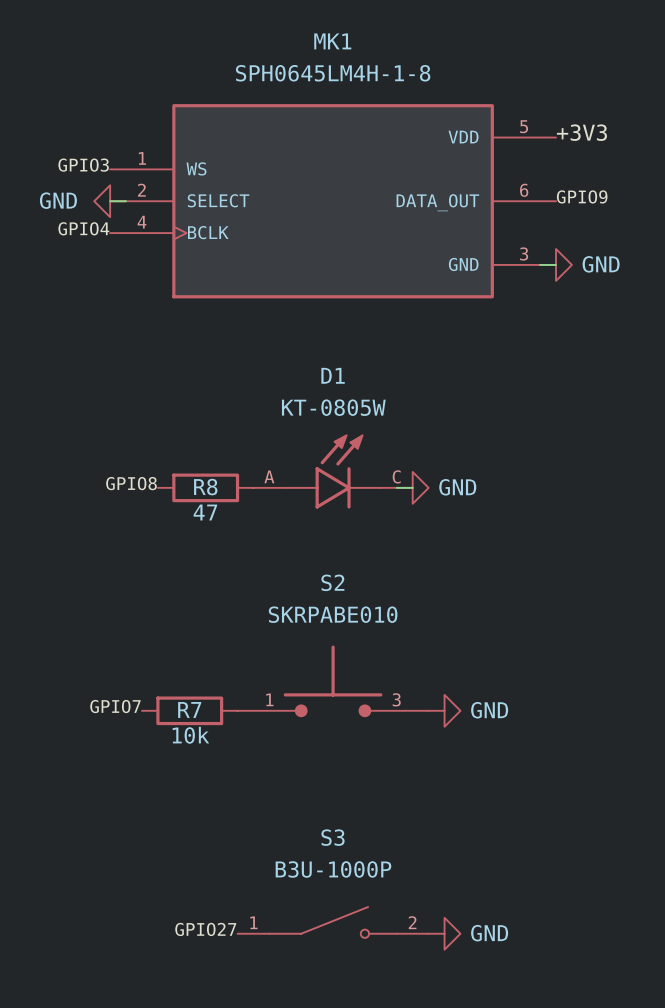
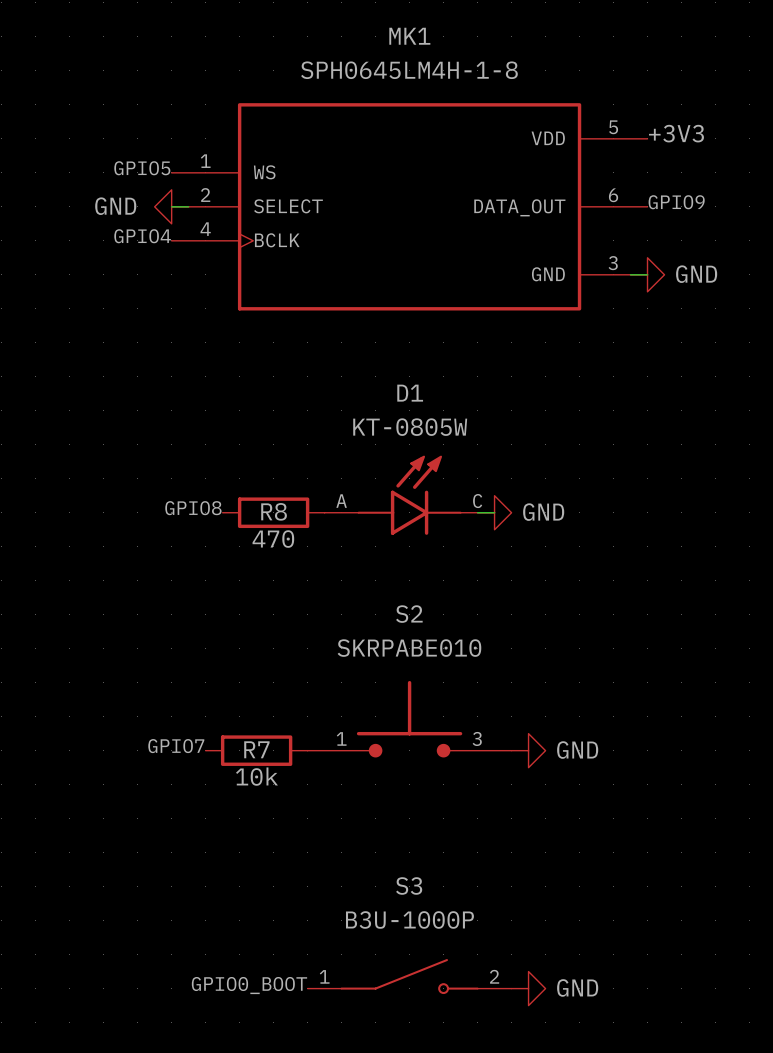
label: GPIO3 (83, 165) -> GPIO5 (142, 168)
R8 value: 47 (205, 512) -> 470 (273, 539)
label: GPIO27 (205, 929) -> GPIO0_BOOT (249, 985)

